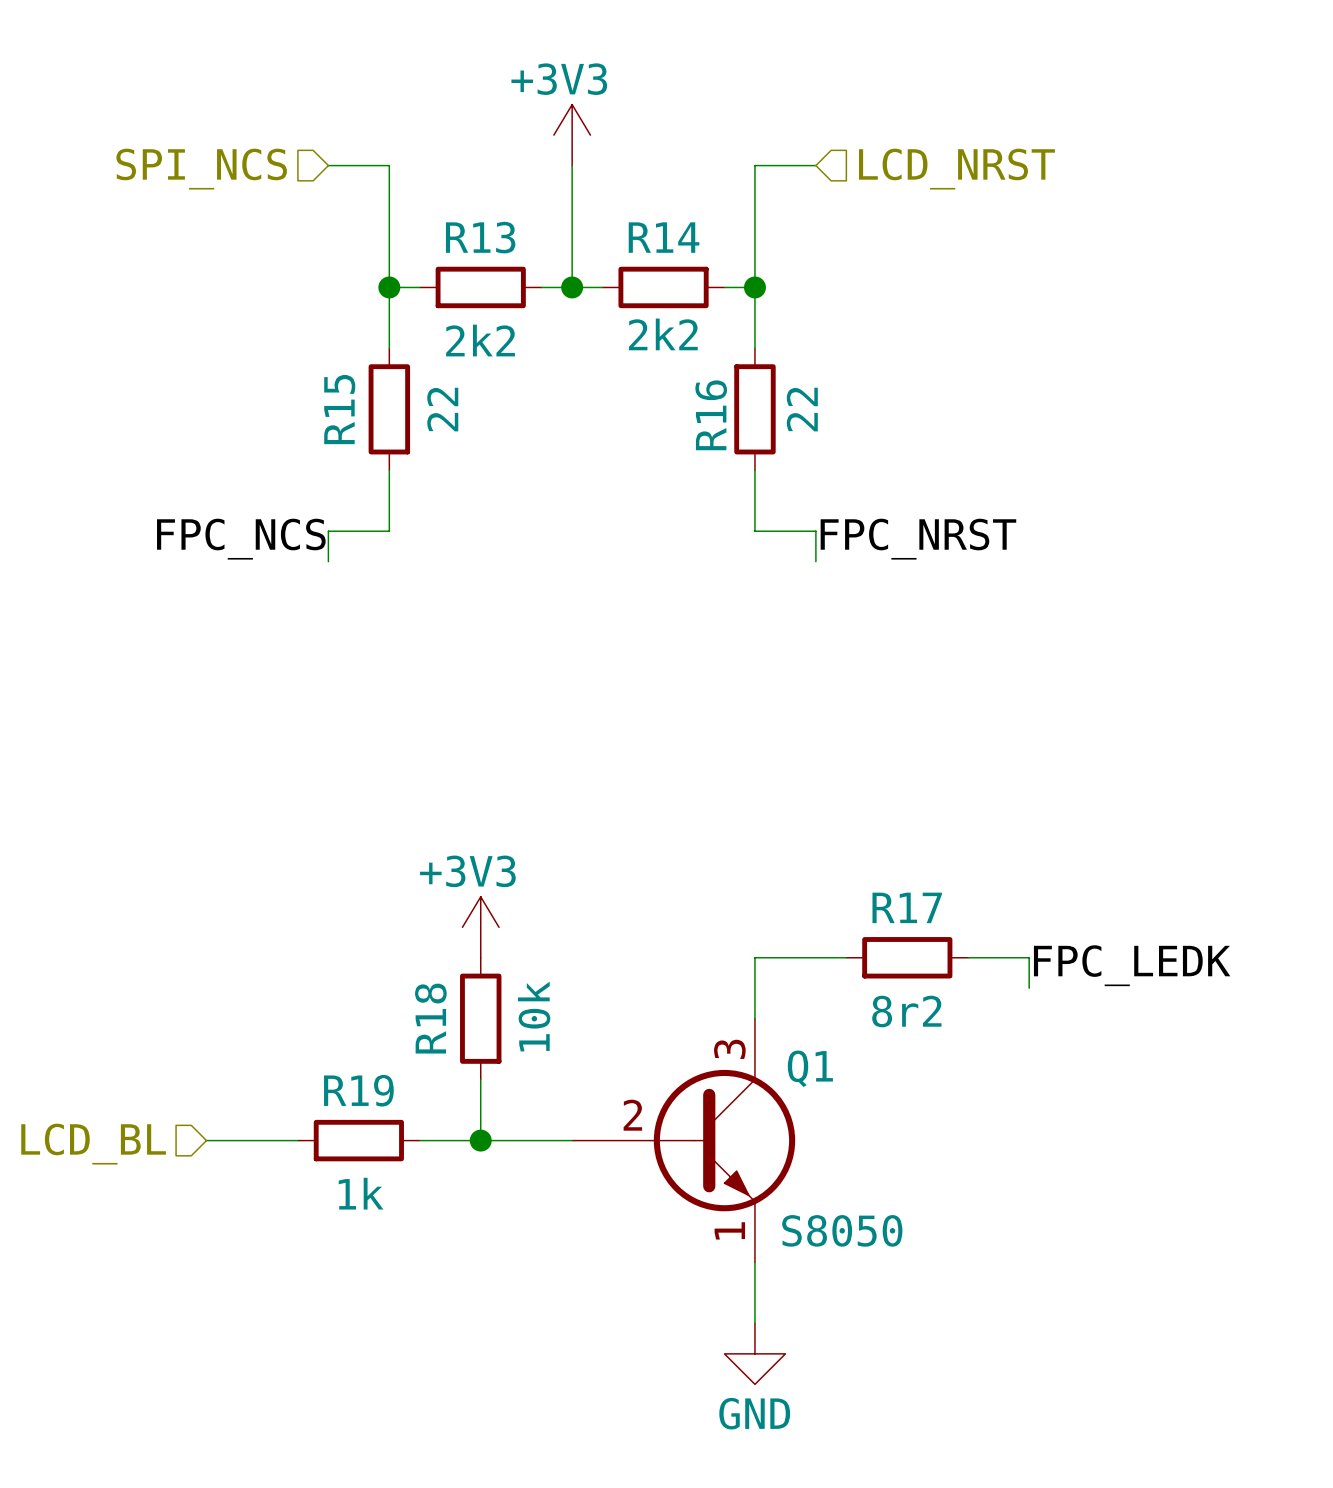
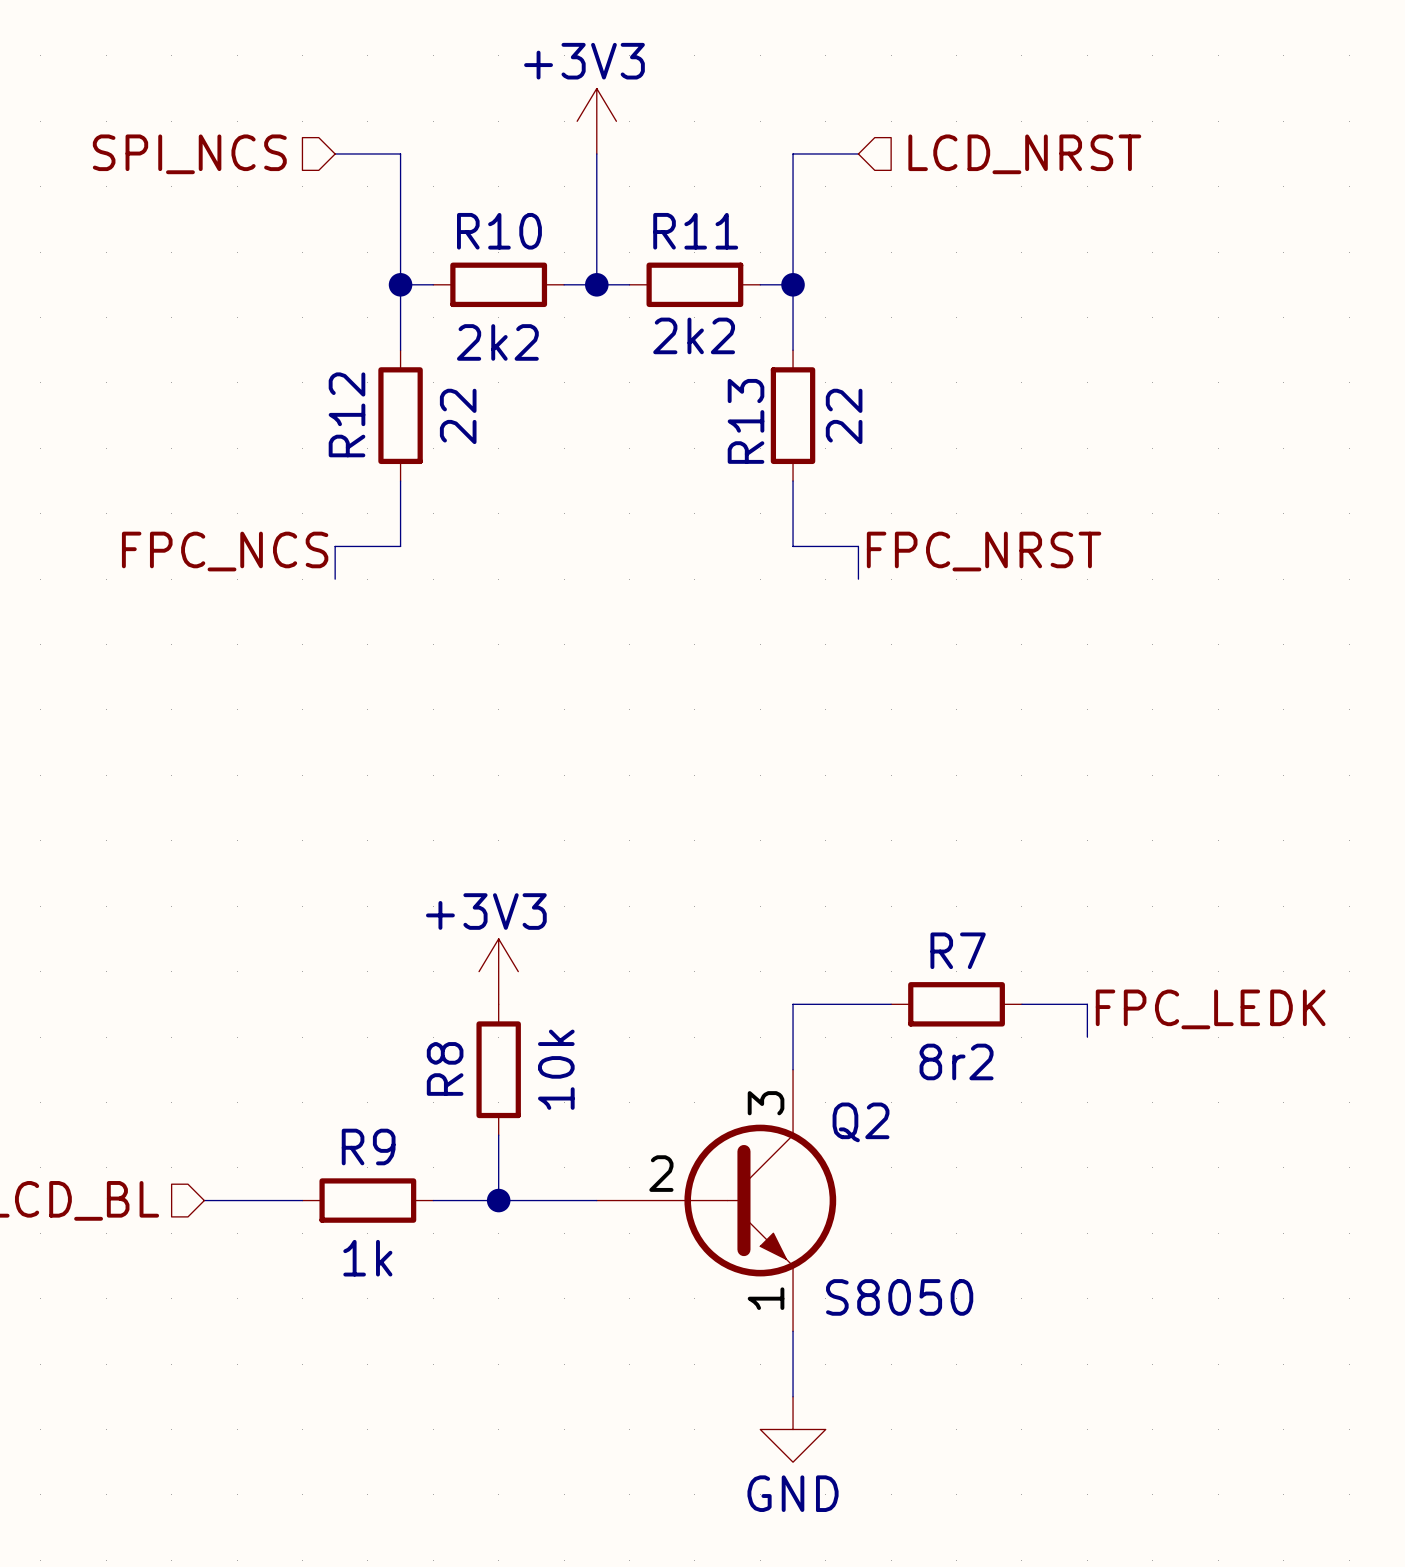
R13 name: R13 (480, 237) -> R10 (499, 231)
R14 name: R14 (664, 237) -> R11 (695, 231)
R15 name: R15 (339, 409) -> R12 (347, 414)
R16 name: R16 (711, 415) -> R13 (746, 421)
R17 name: R17 (907, 907) -> R7 (958, 950)
R18 name: R18 (430, 1018) -> R8 (445, 1068)
Q1 name: Q1 (810, 1068) -> Q2 (861, 1122)
R19 name: R19 (358, 1090) -> R9 (368, 1147)

